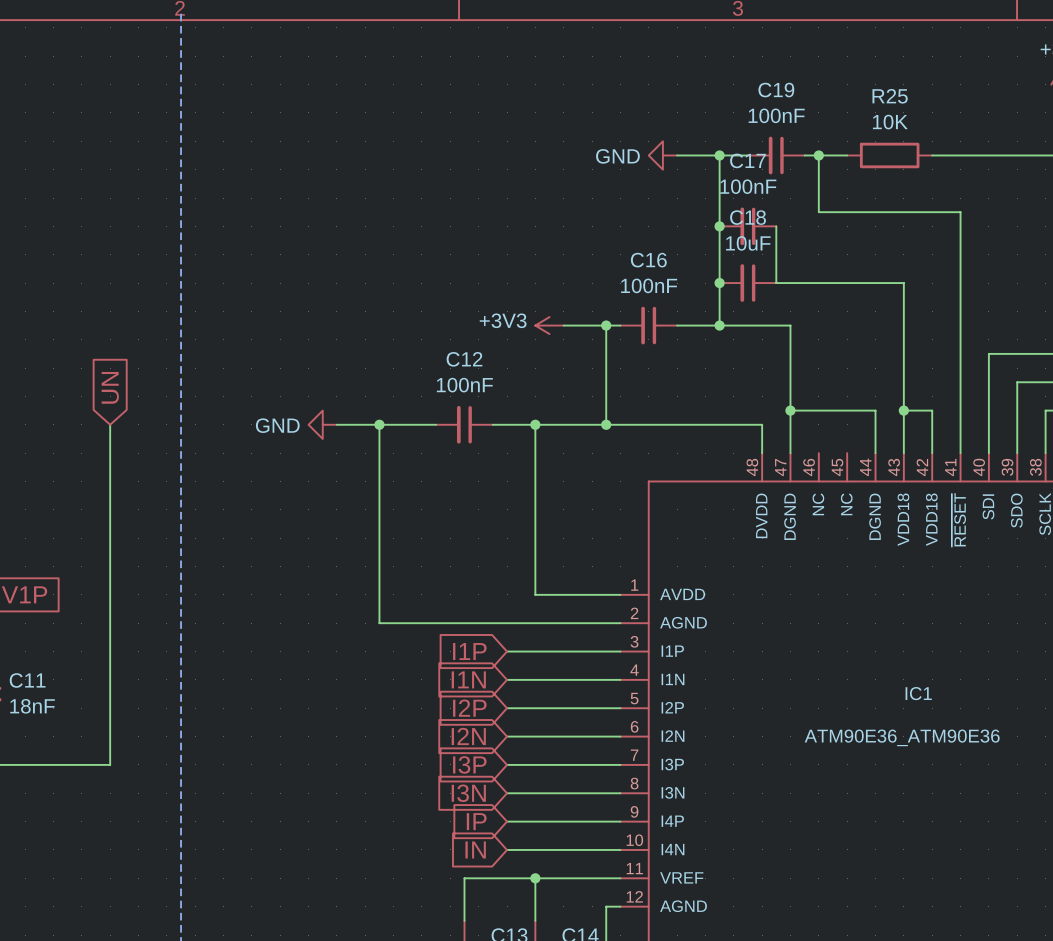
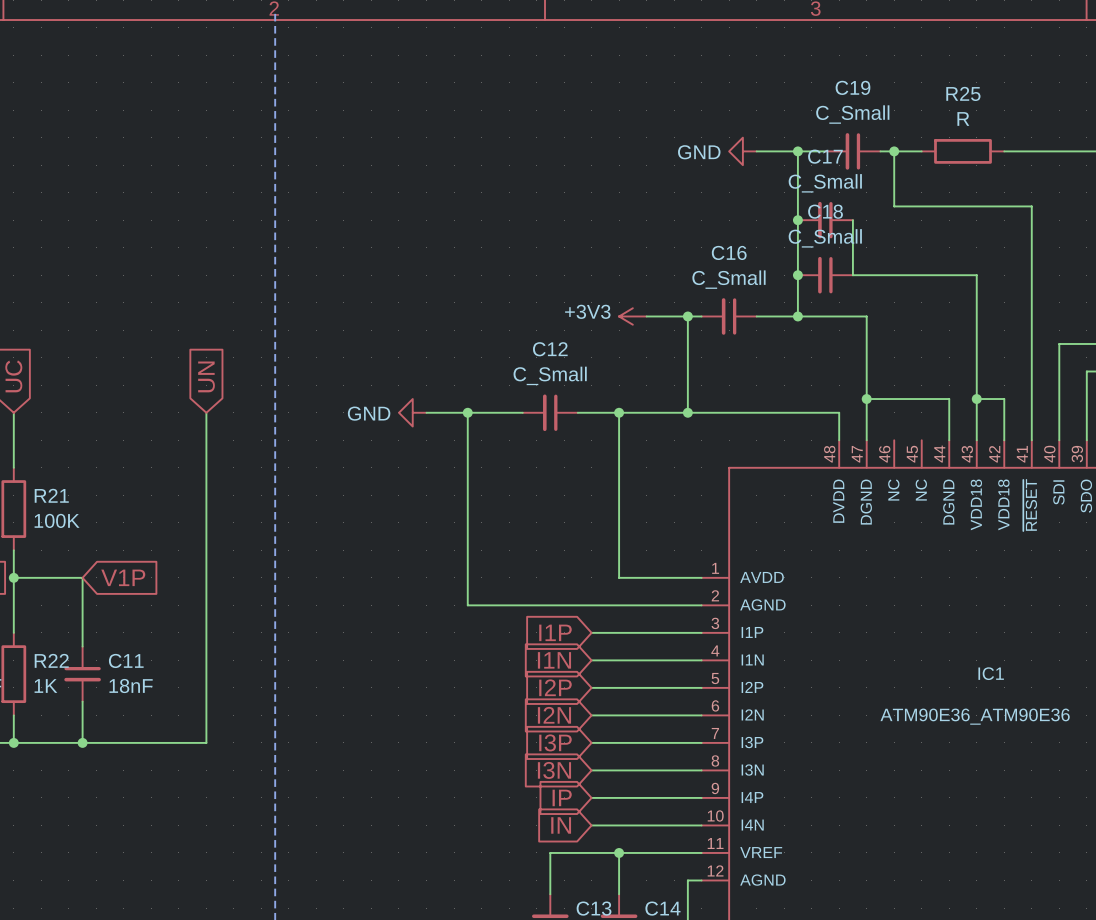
C19 value: 100nF (776, 115) -> C_Small (852, 114)
R25 value: 10K (890, 122) -> R (963, 118)
C17 value: 100nF (748, 186) -> C_Small (825, 183)
C18 value: 10uF (748, 243) -> C_Small (825, 238)
C16 value: 100nF (649, 285) -> C_Small (728, 279)
C12 value: 100nF (464, 385) -> C_Small (550, 375)

